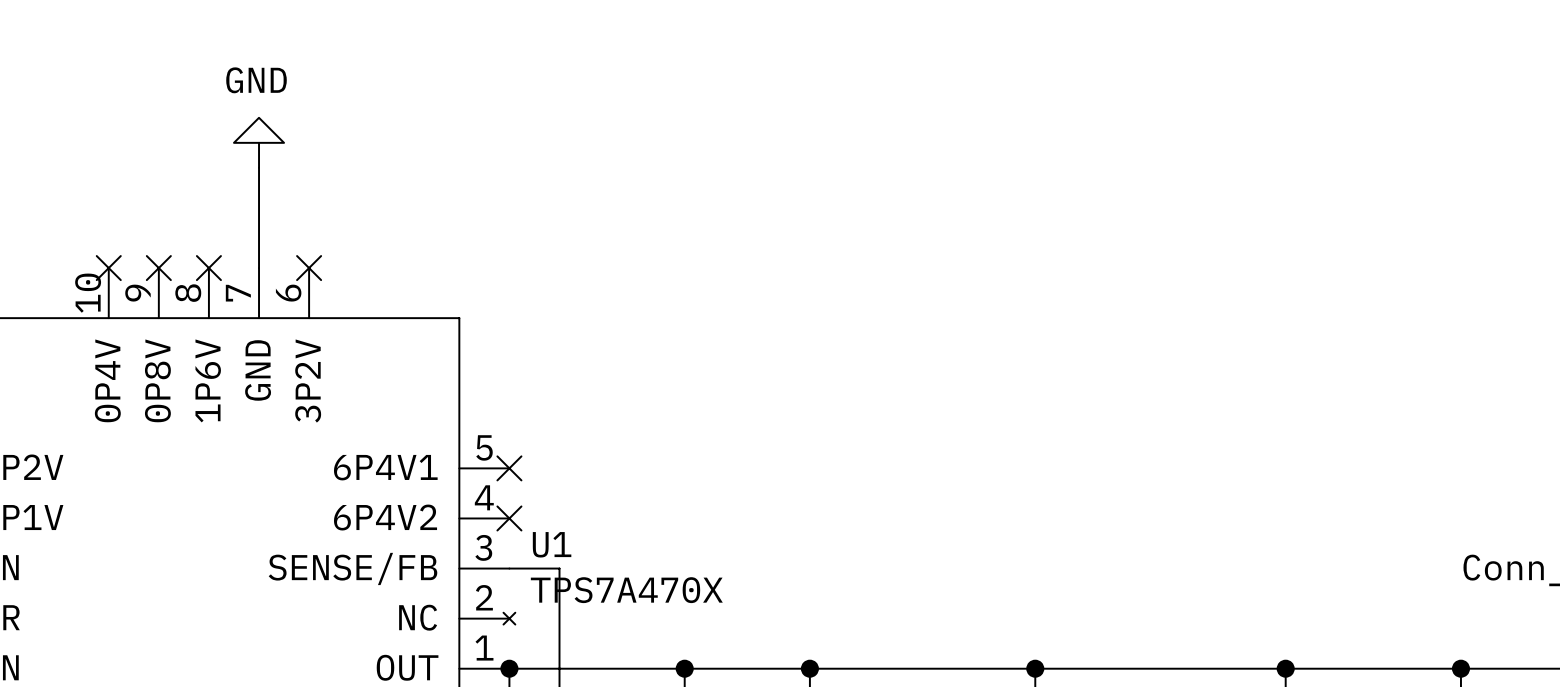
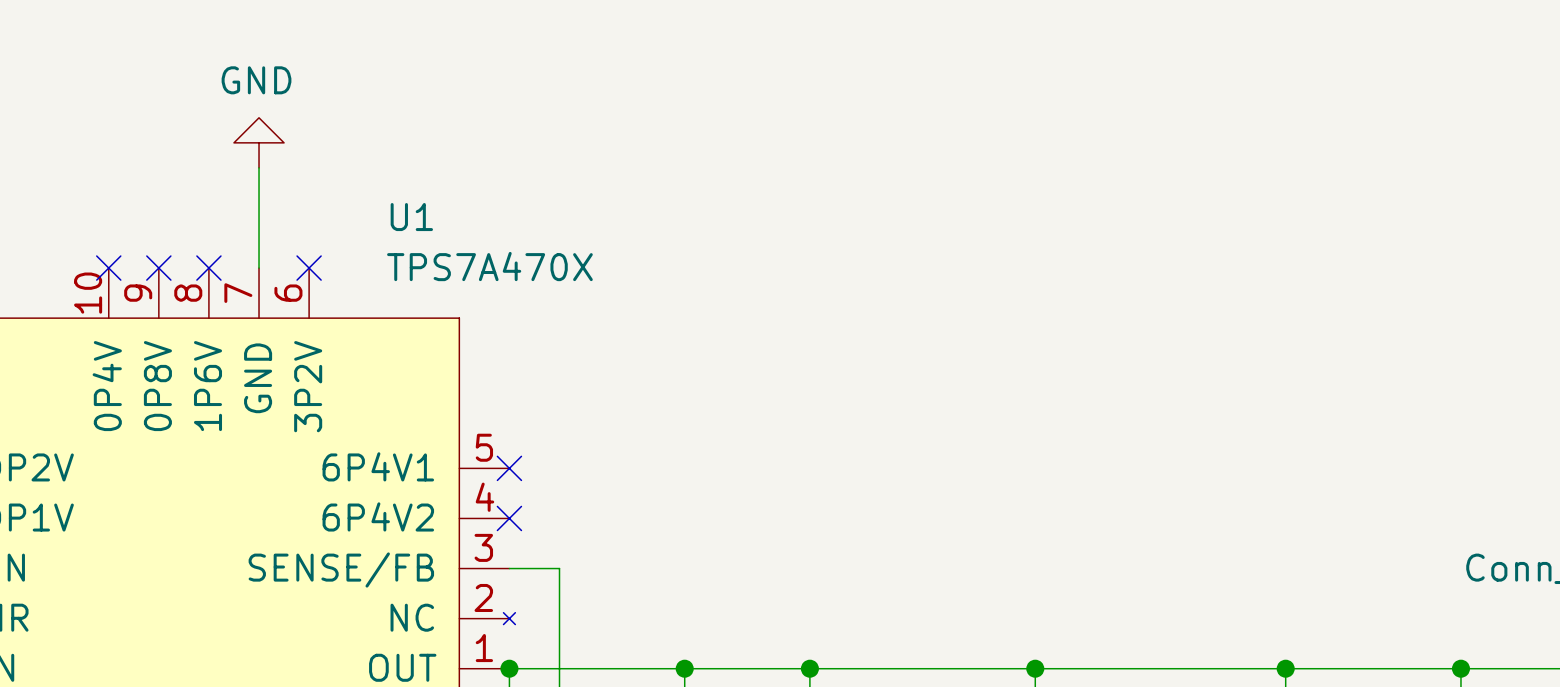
U1 name position: U1 (552, 544) -> U1 (411, 217)
U1 value position: TPS7A470X (626, 590) -> TPS7A470X (489, 266)

